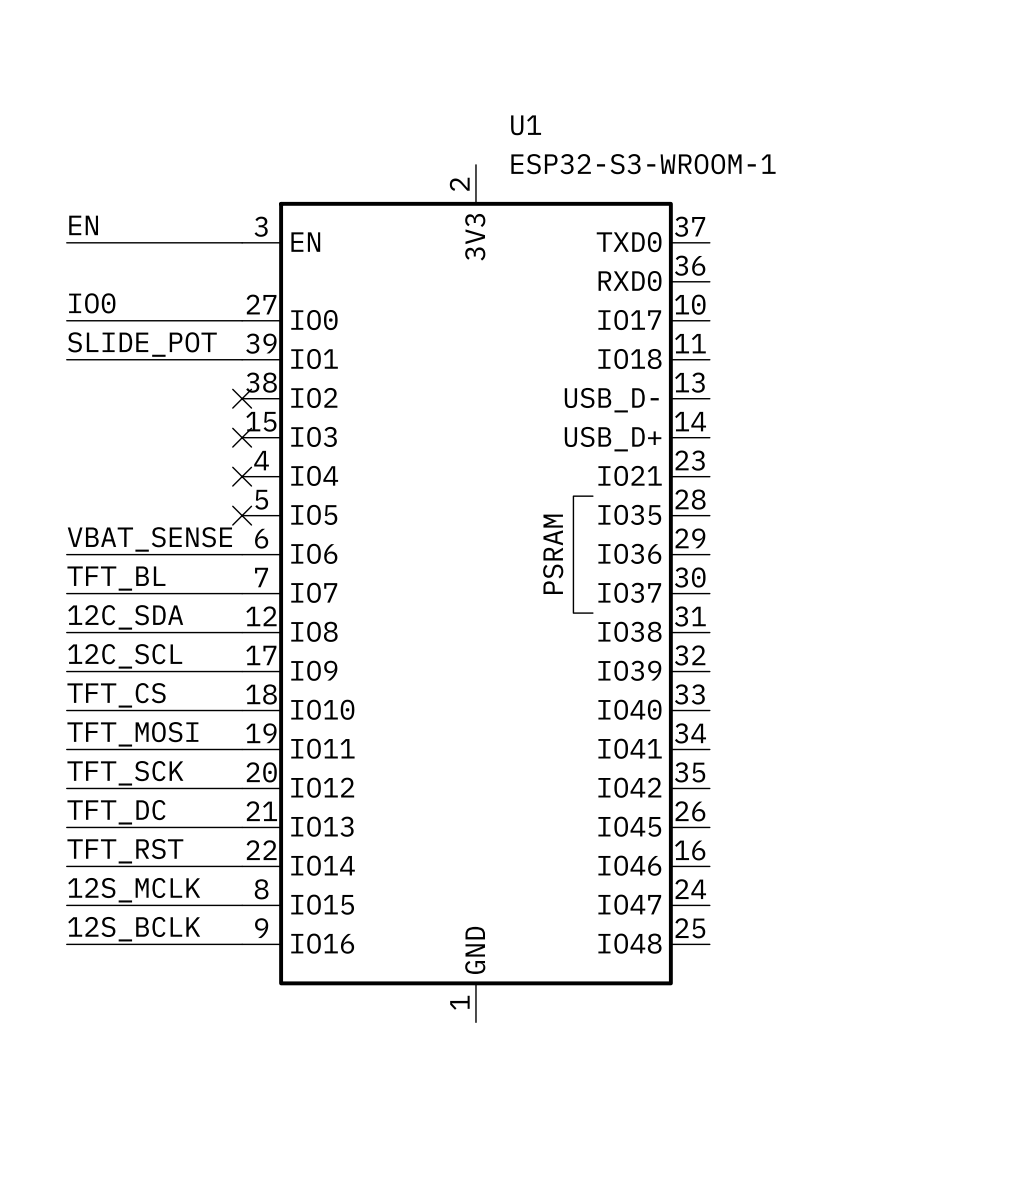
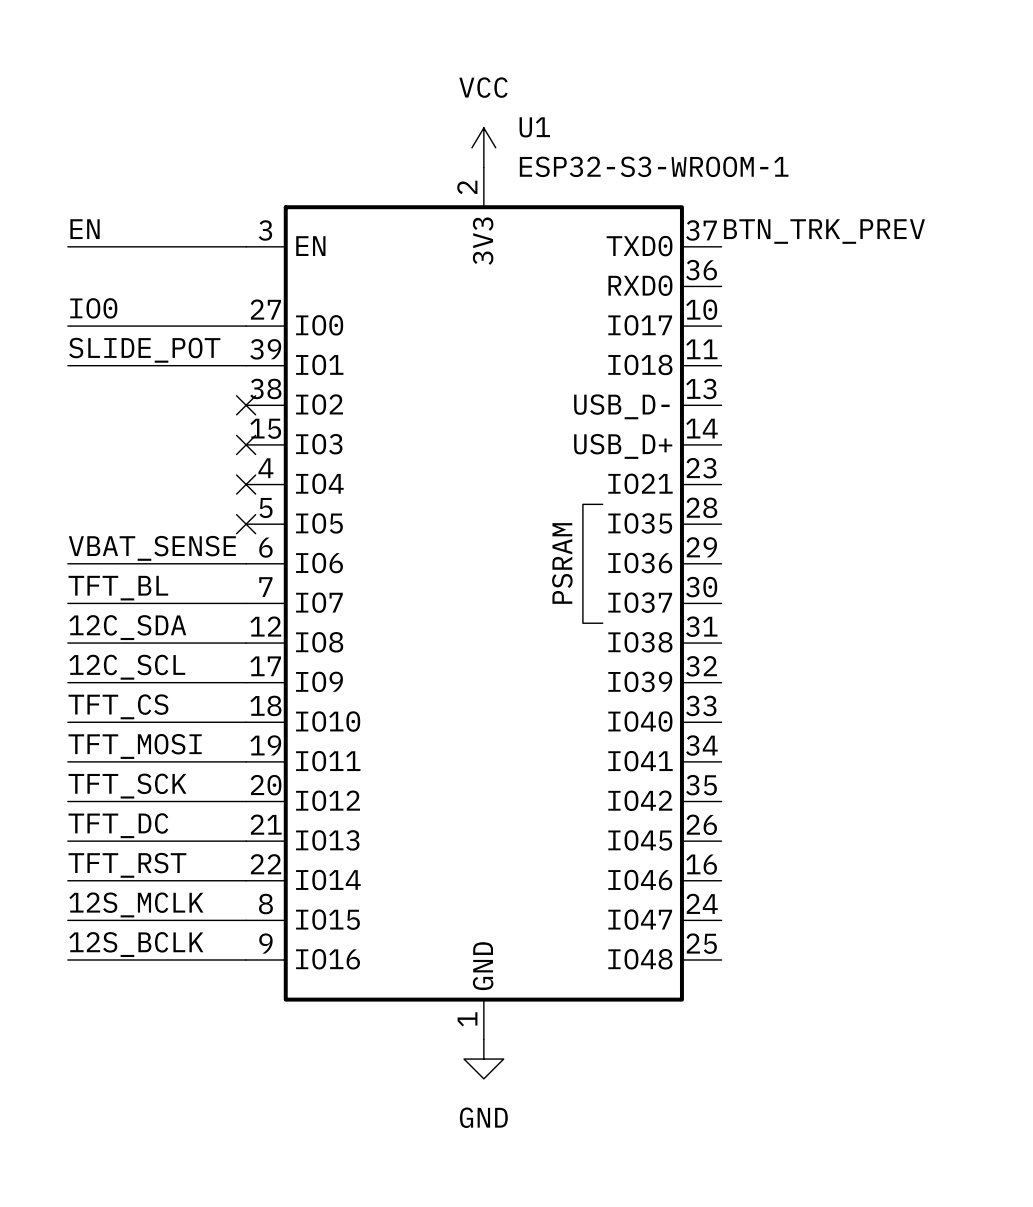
power symbol: none -> VCC (483, 147)
label: none -> BTN_TRK_PREV (824, 231)
power symbol: none -> GND (483, 1059)

